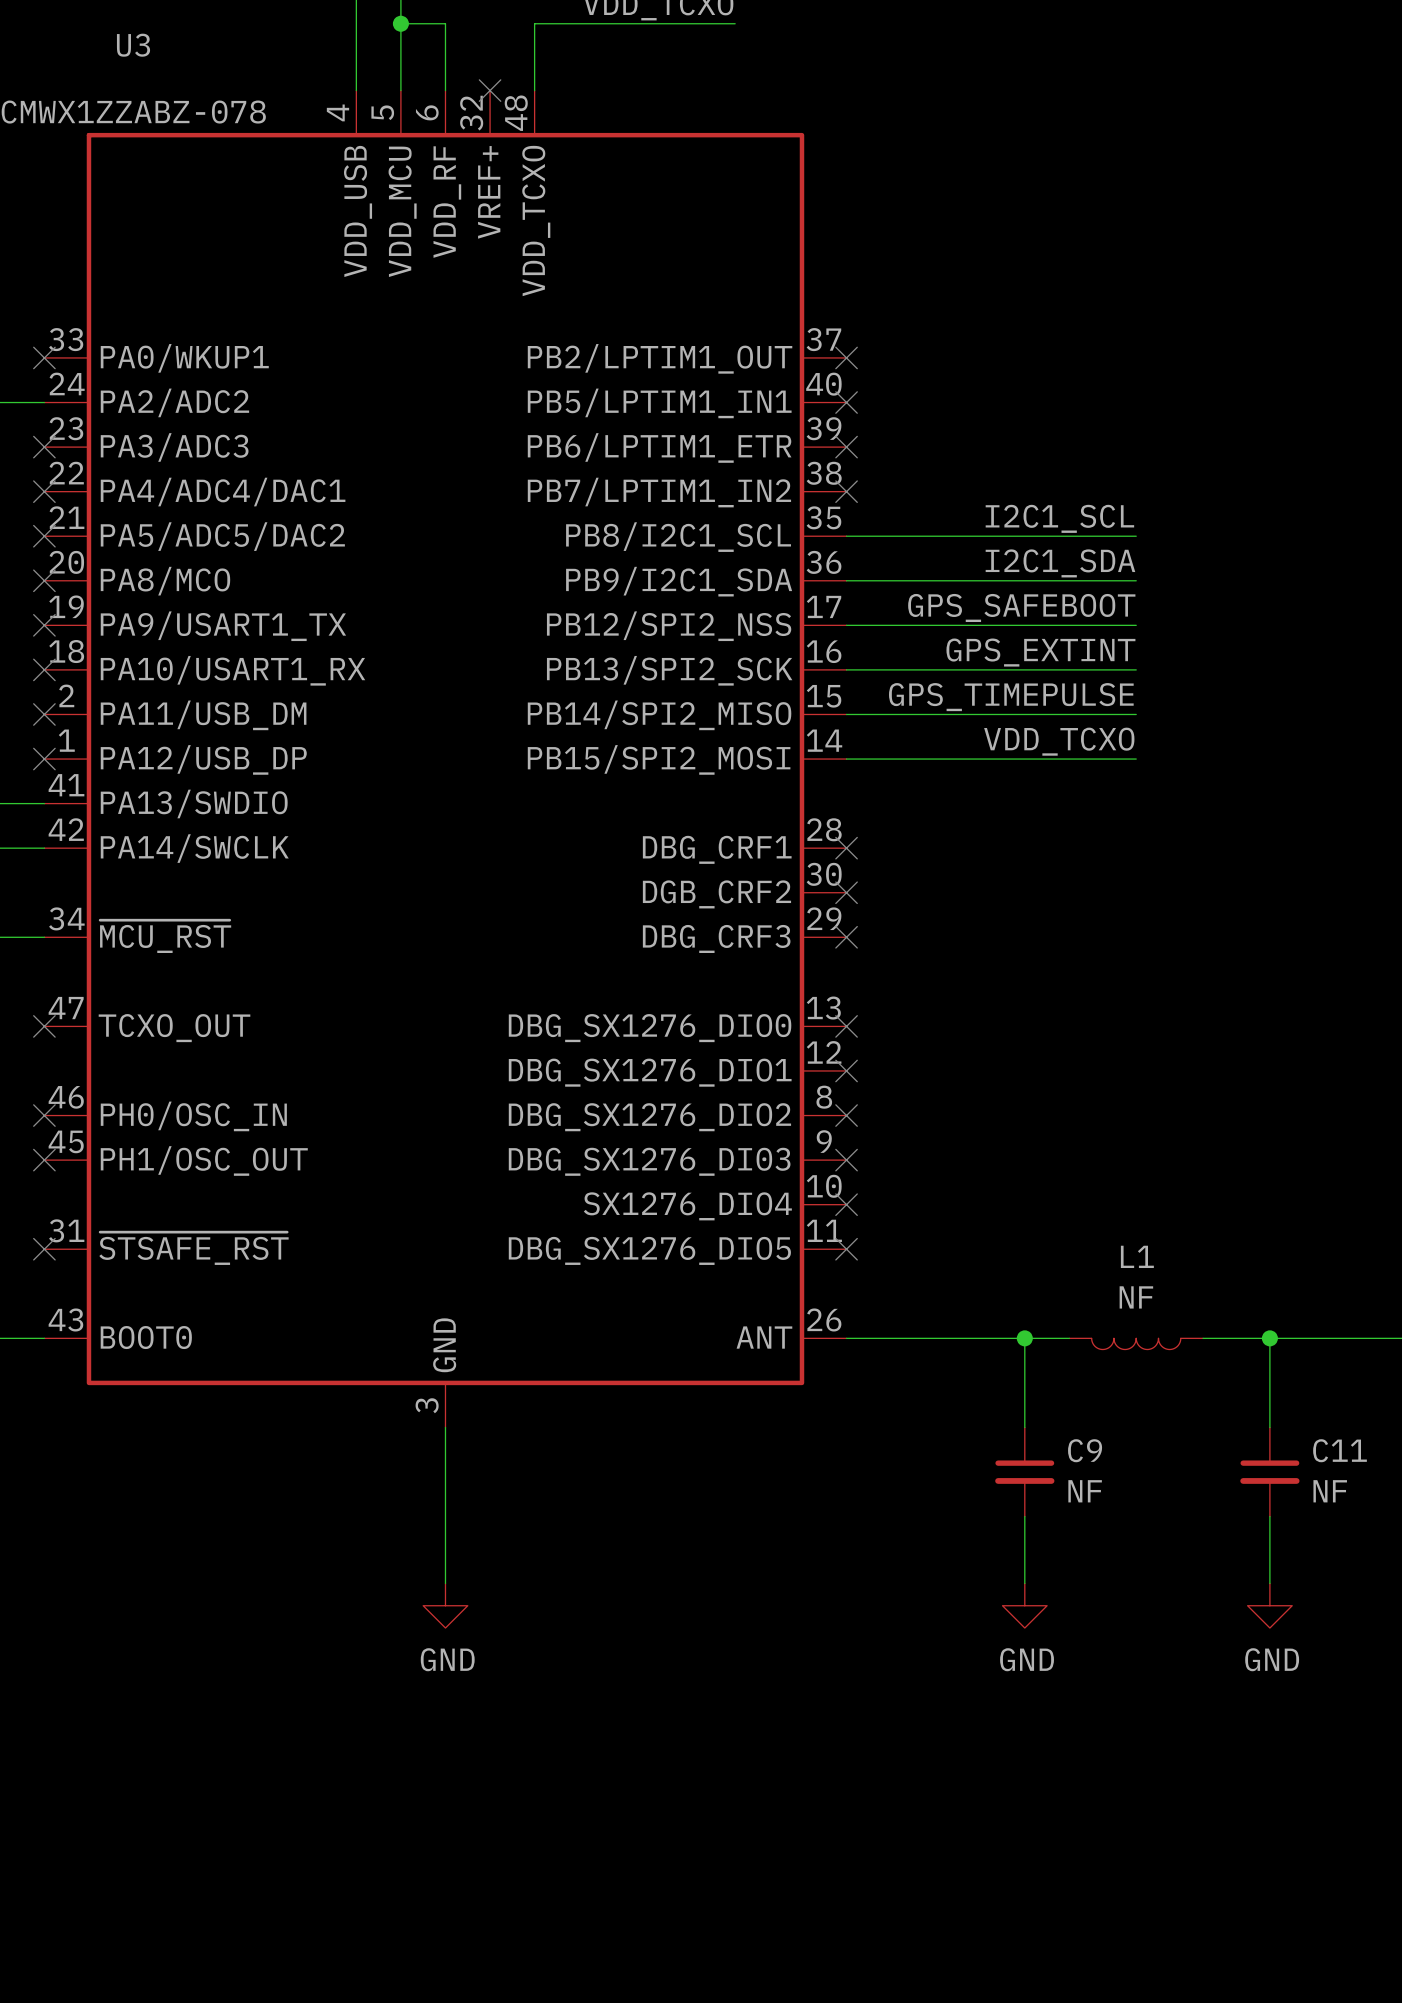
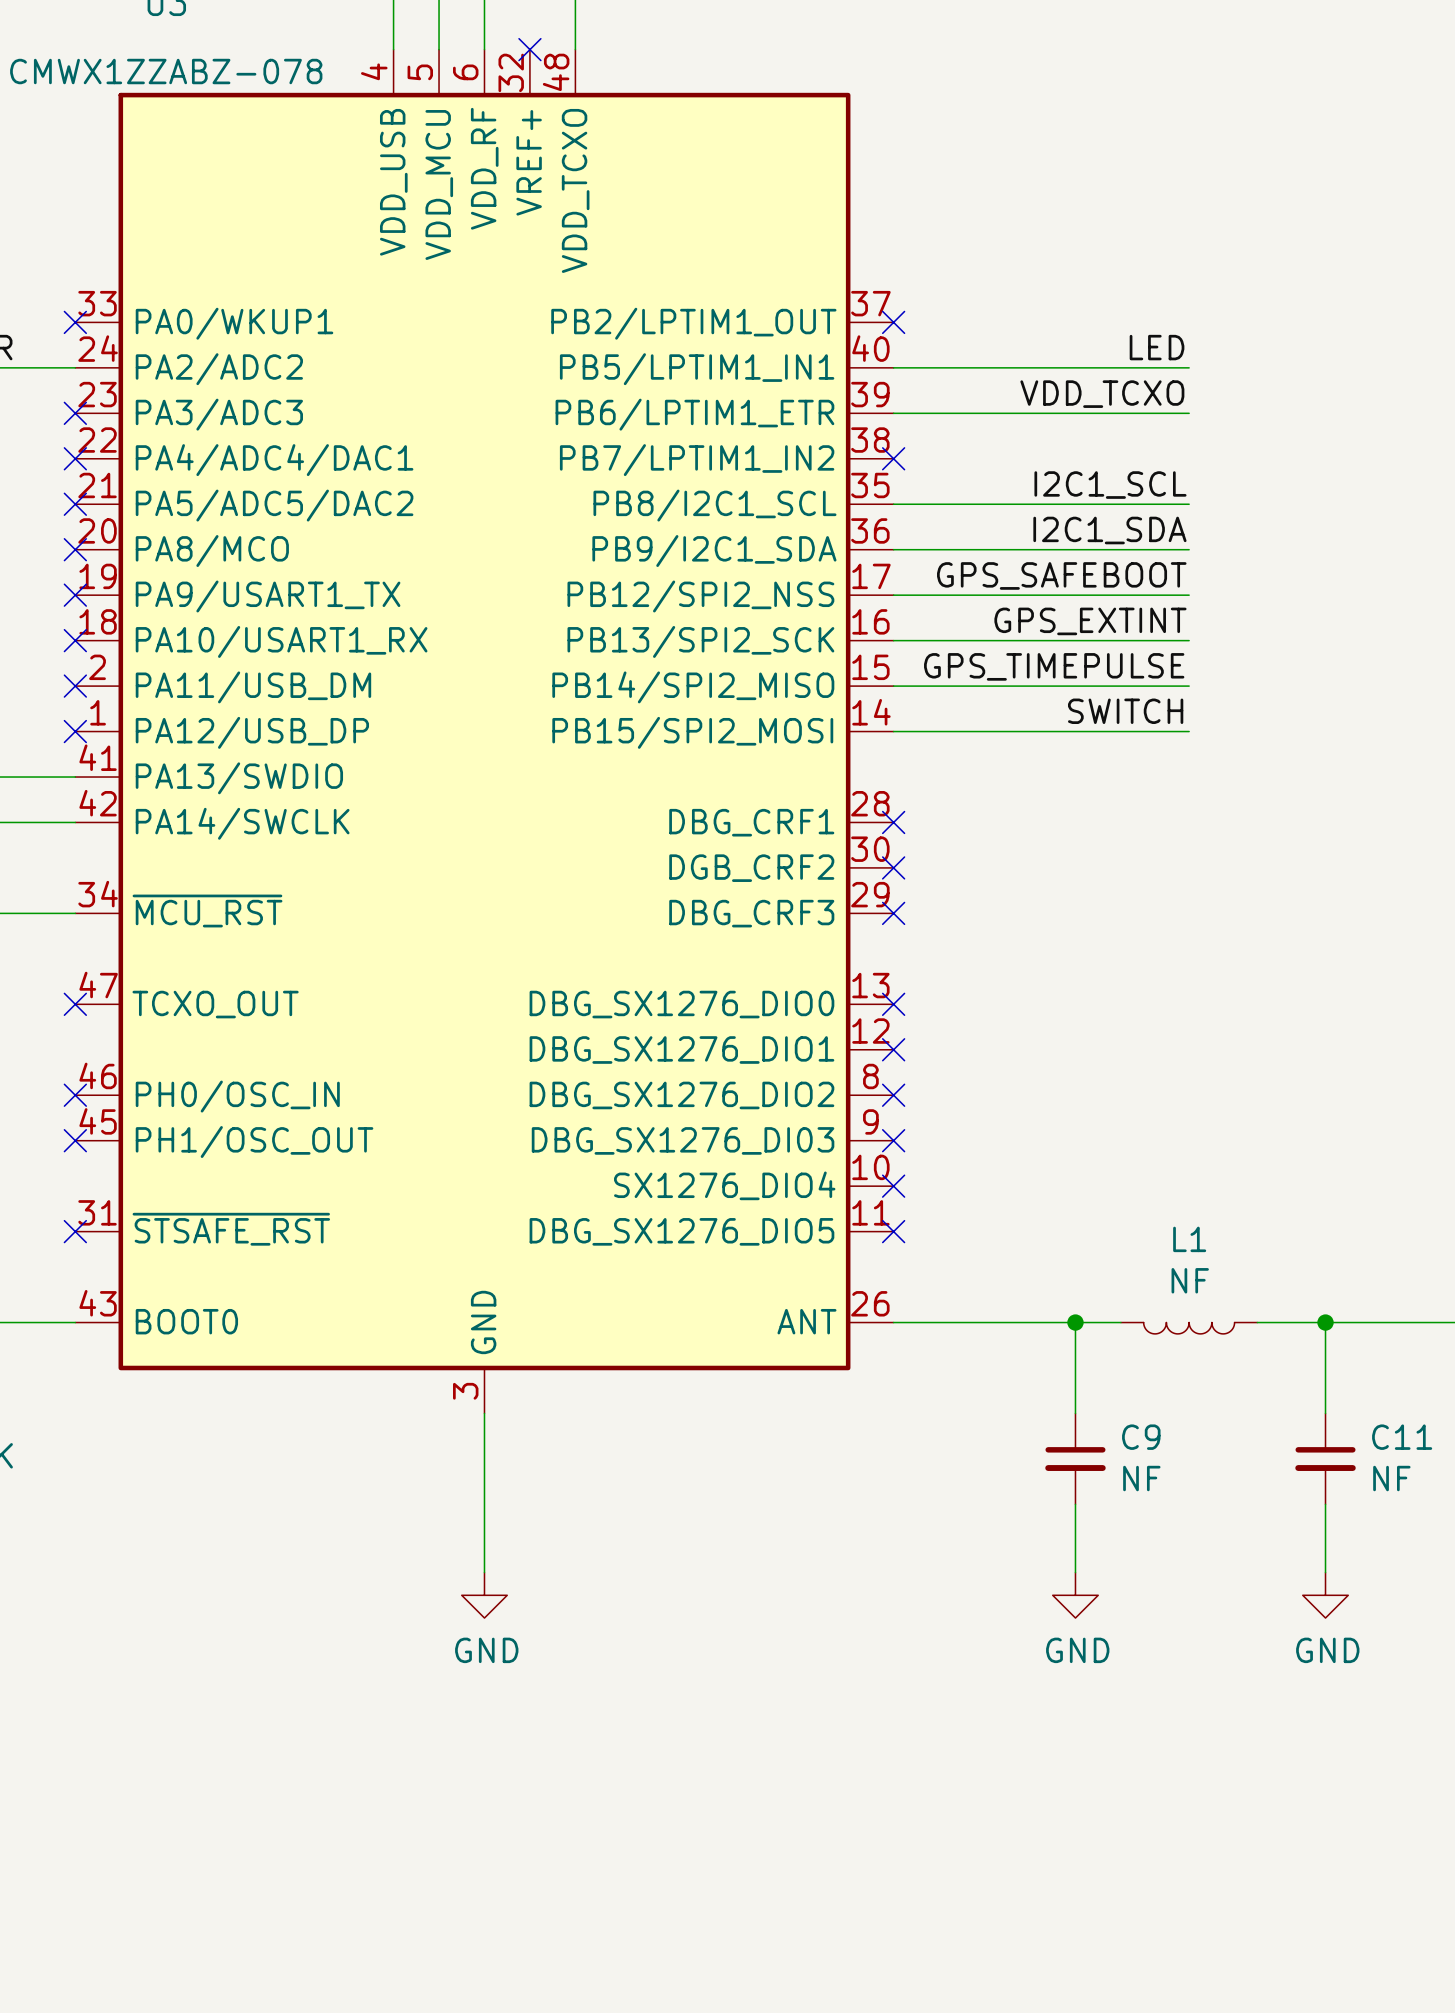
label: none -> LED (1157, 347)
wire: none -> (893, 367) (1189, 367)
no-connect mark: (846, 402) -> none
label: none -> VDD_TCXO (1102, 394)
wire: none -> (893, 413) (1189, 413)
no-connect mark: (846, 447) -> none
label: VDD_TCXO (1059, 741) -> SWITCH (1125, 711)

